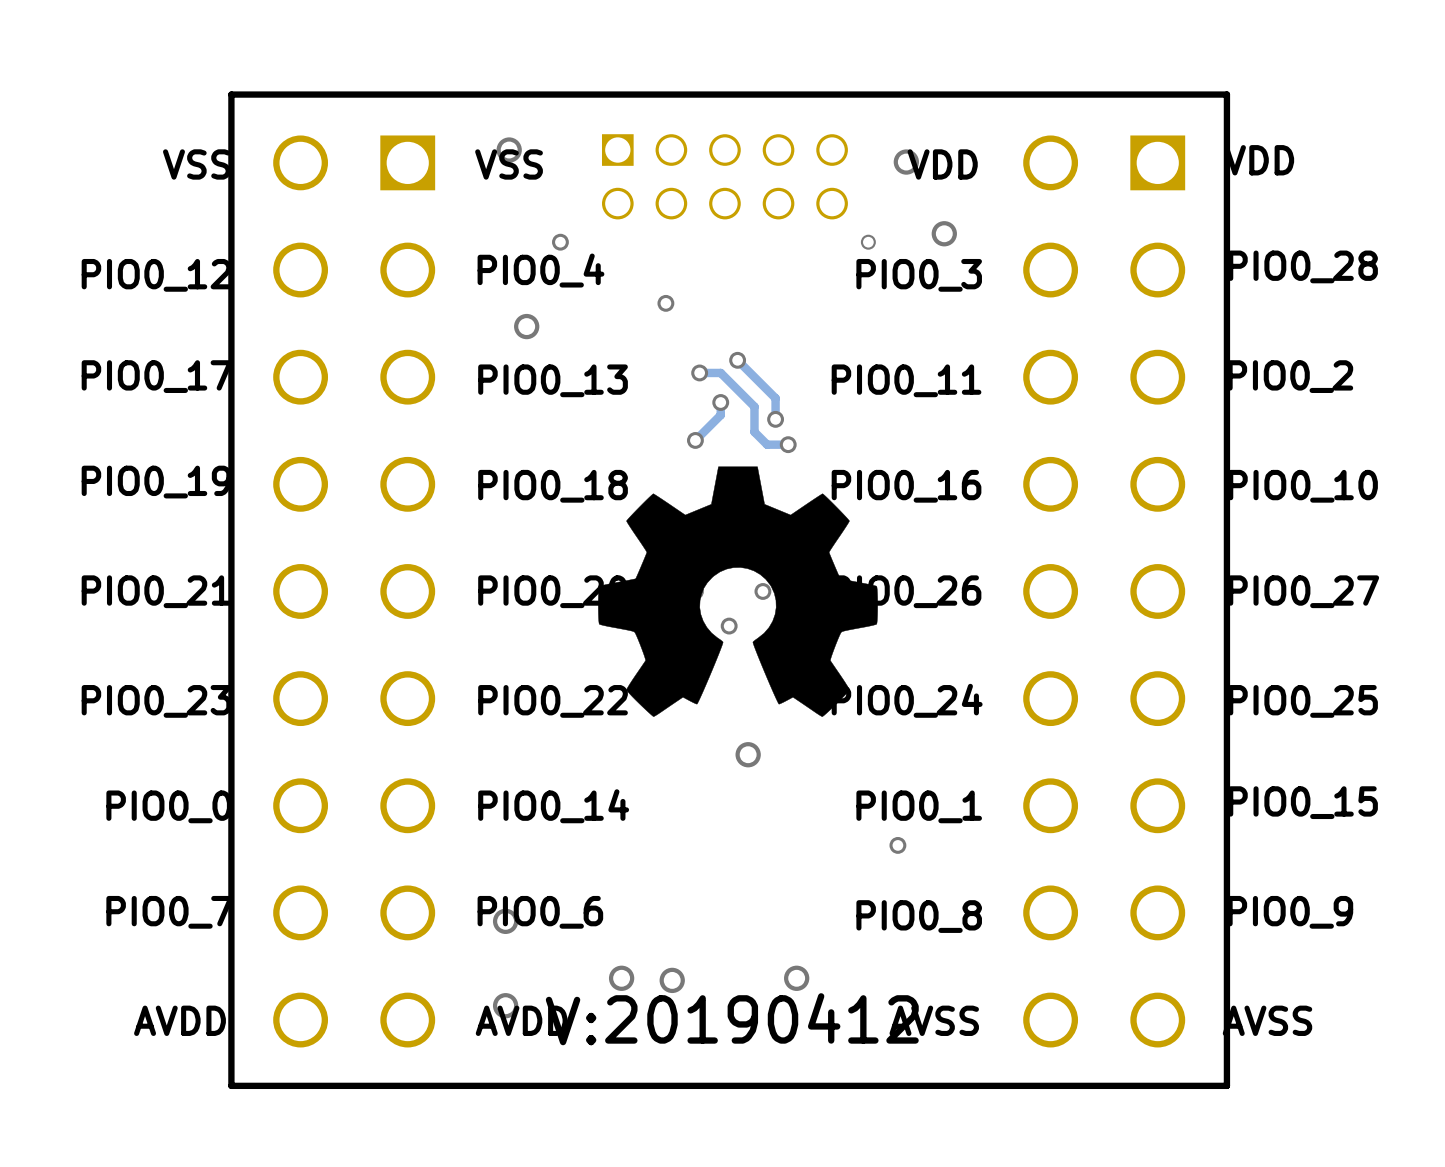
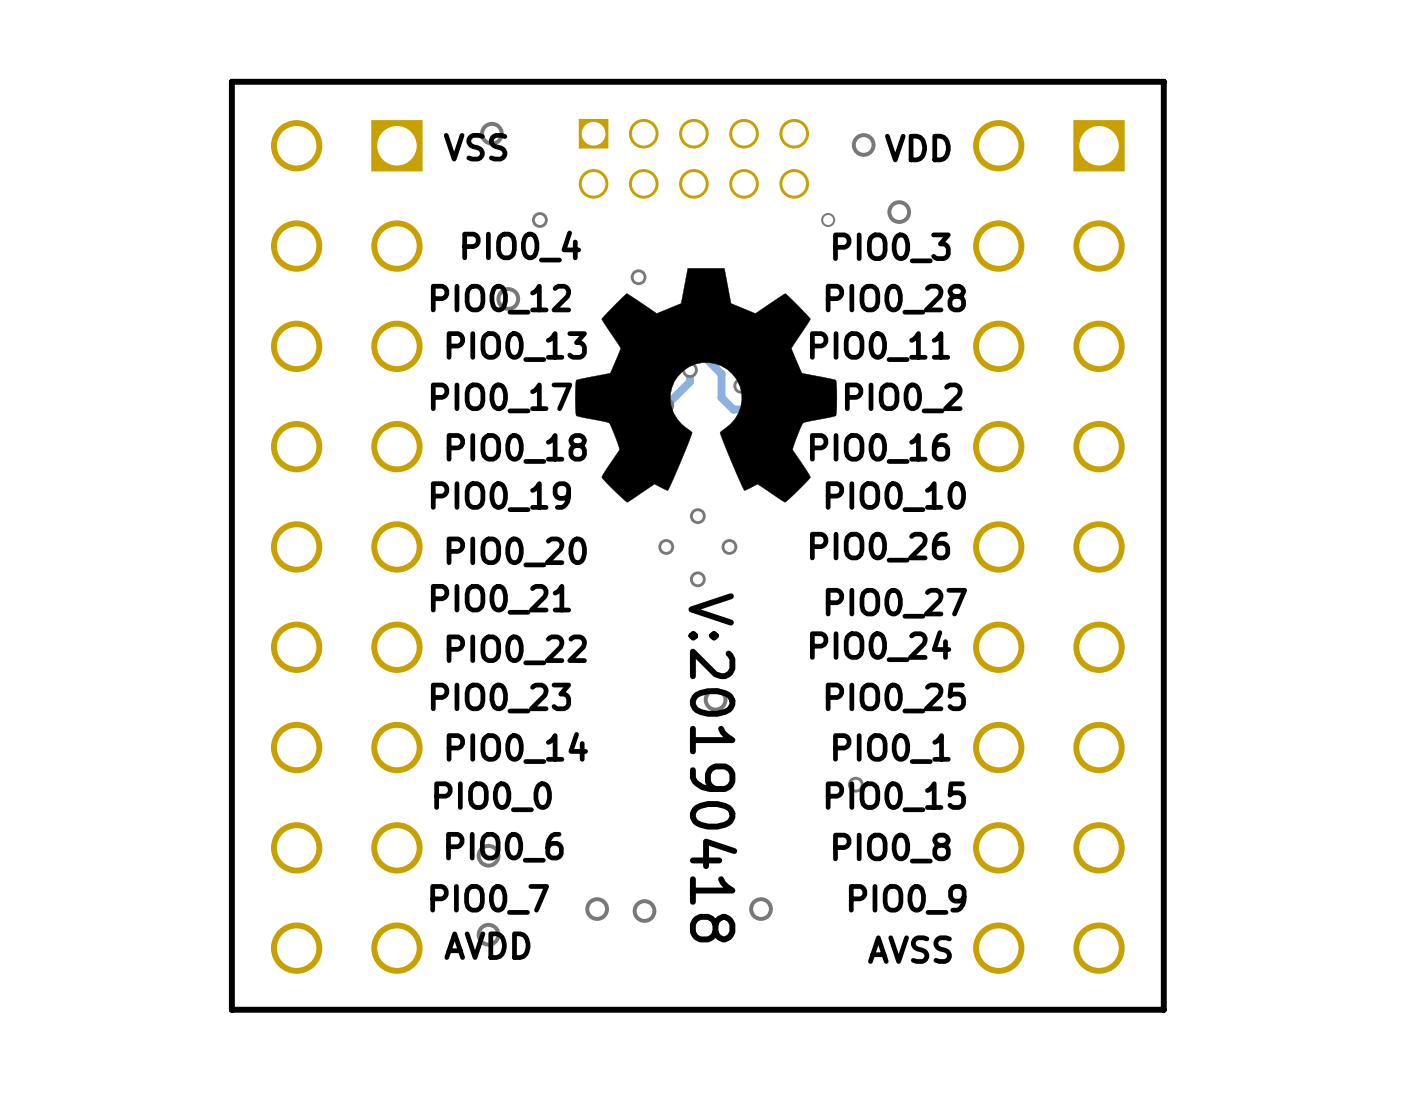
part footprint: [273, 135, 436, 1048] -> [270, 120, 423, 974]
part footprint: [1023, 135, 1186, 1048] -> [973, 120, 1125, 974]
drawing position: (738, 591) -> (706, 385)
drawing: none -> [688, 593, 738, 943]
drawing: [545, 993, 919, 1046] -> none

